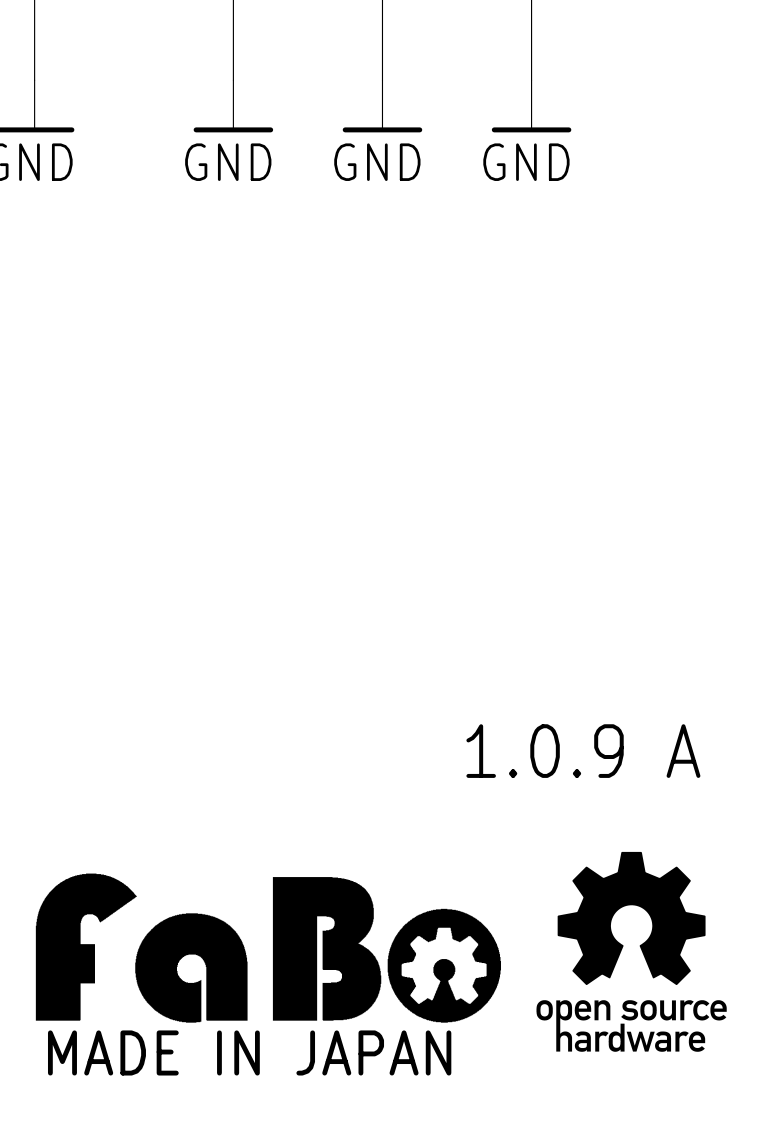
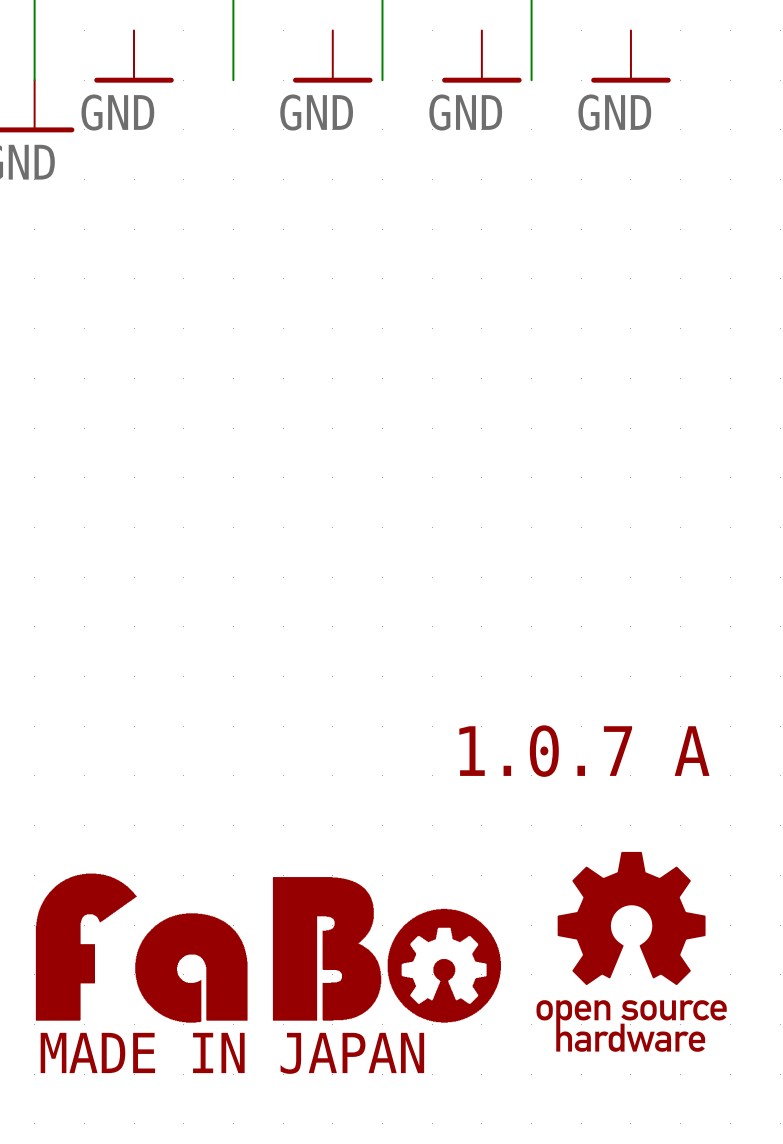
power symbol: none -> GND (134, 56)
power symbol: none -> GND (332, 56)
power symbol: none -> GND (481, 56)
power symbol: none -> GND (630, 56)
power symbol: GND (233, 106) -> none
power symbol: GND (382, 106) -> none
power symbol: GND (531, 106) -> none
text: 1.0.9 A (583, 751) -> 1.0.7 A (584, 751)

